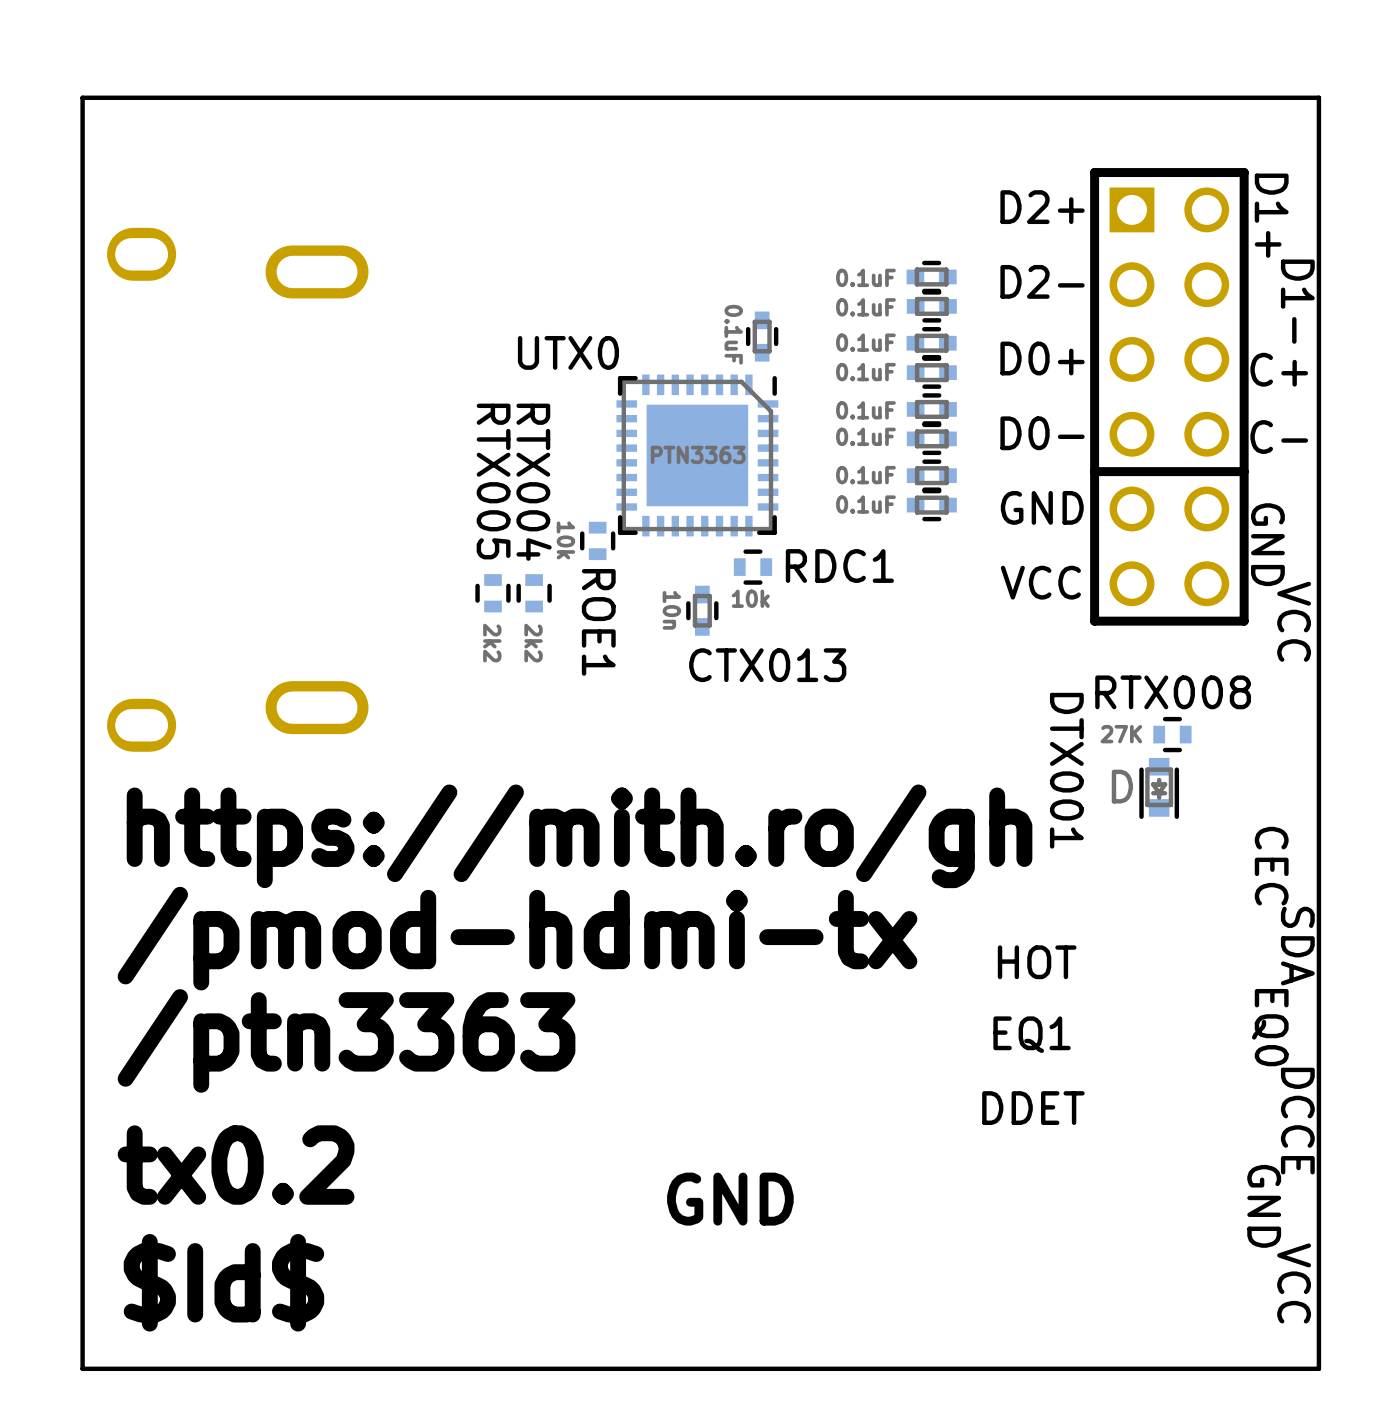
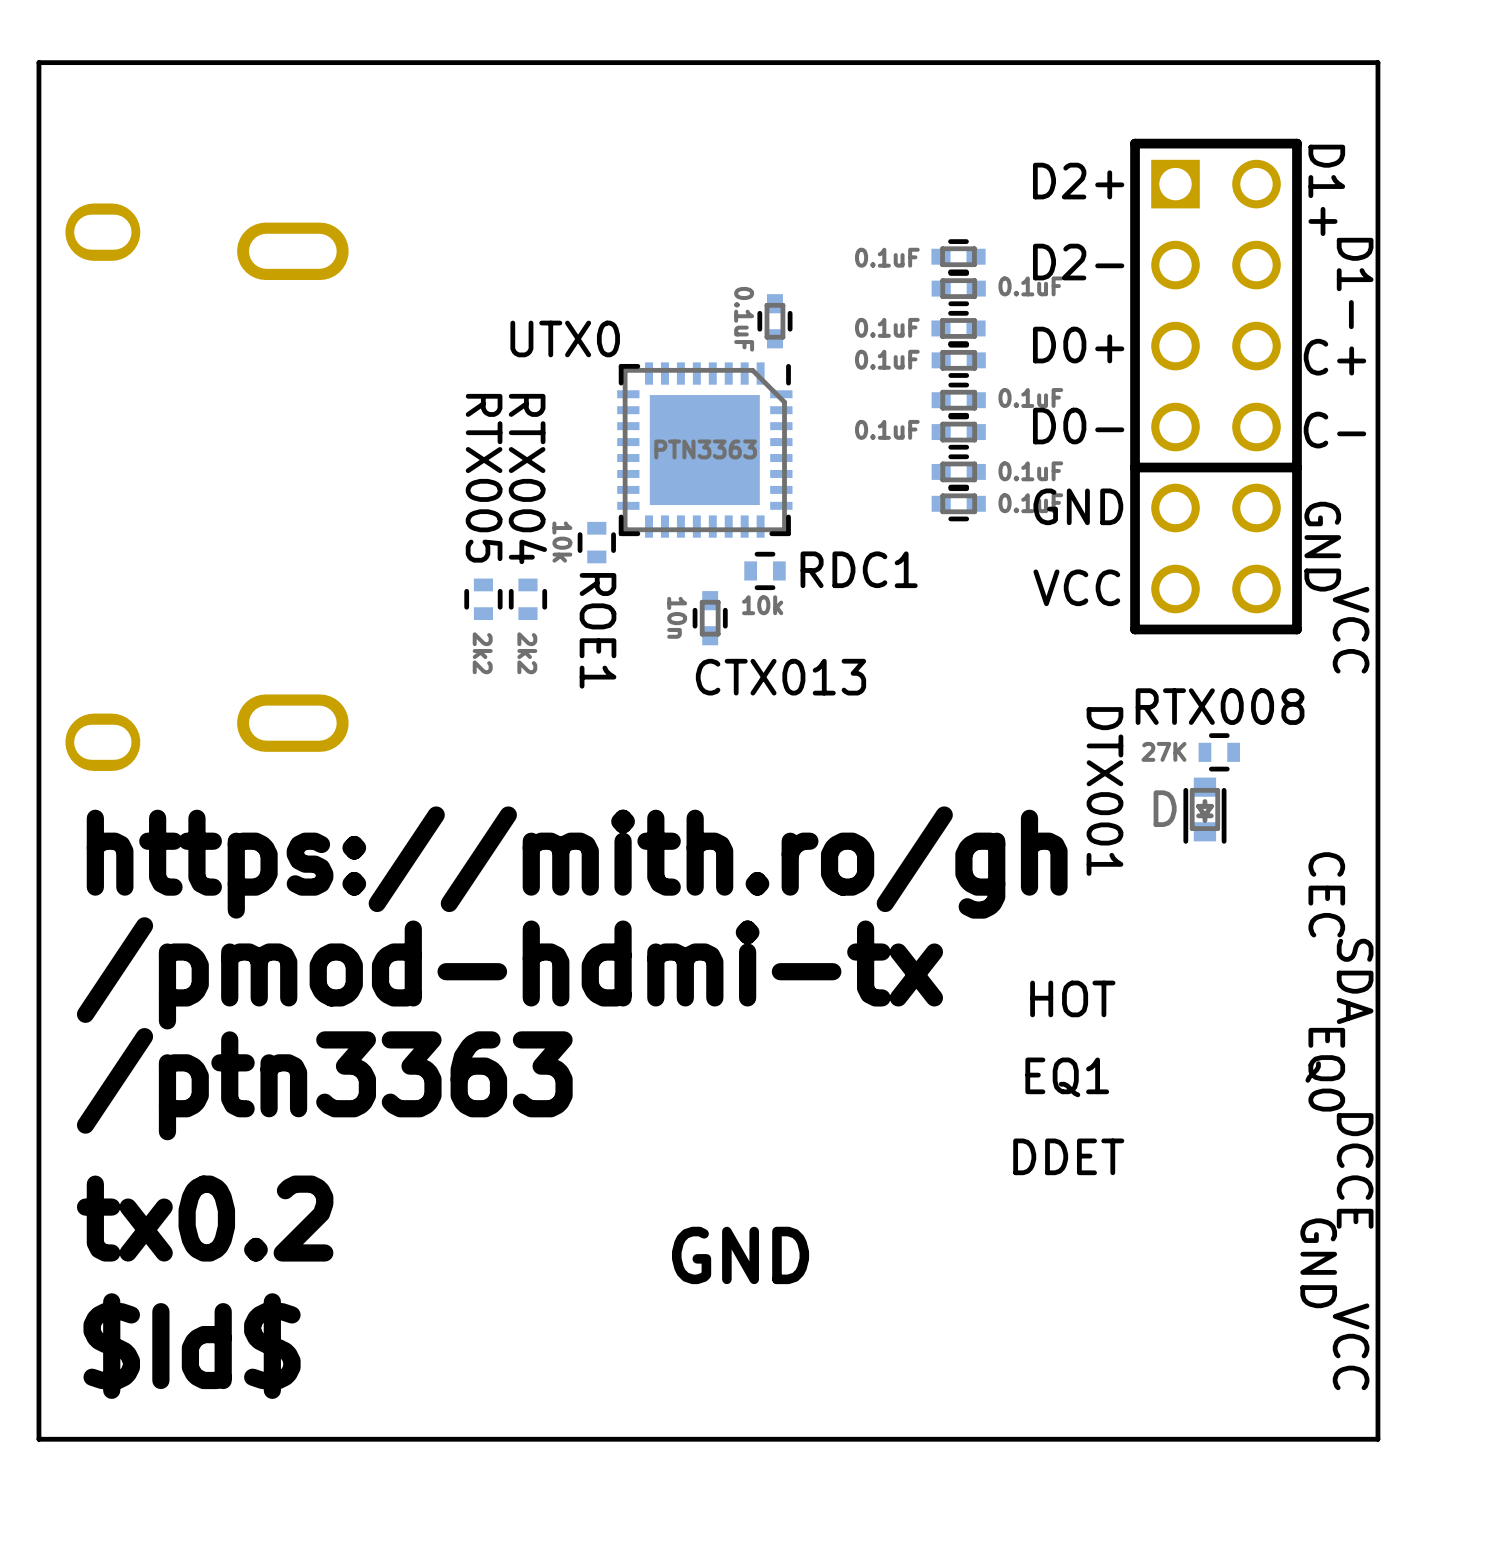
part value position: 0.1uF (865, 307) -> 0.1uF (1030, 286)
part value position: 0.1uF (865, 410) -> 0.1uF (1030, 398)
part value position: 0.1uF (865, 475) -> 0.1uF (1030, 471)
part value position: 0.1uF (865, 504) -> 0.1uF (1030, 503)

